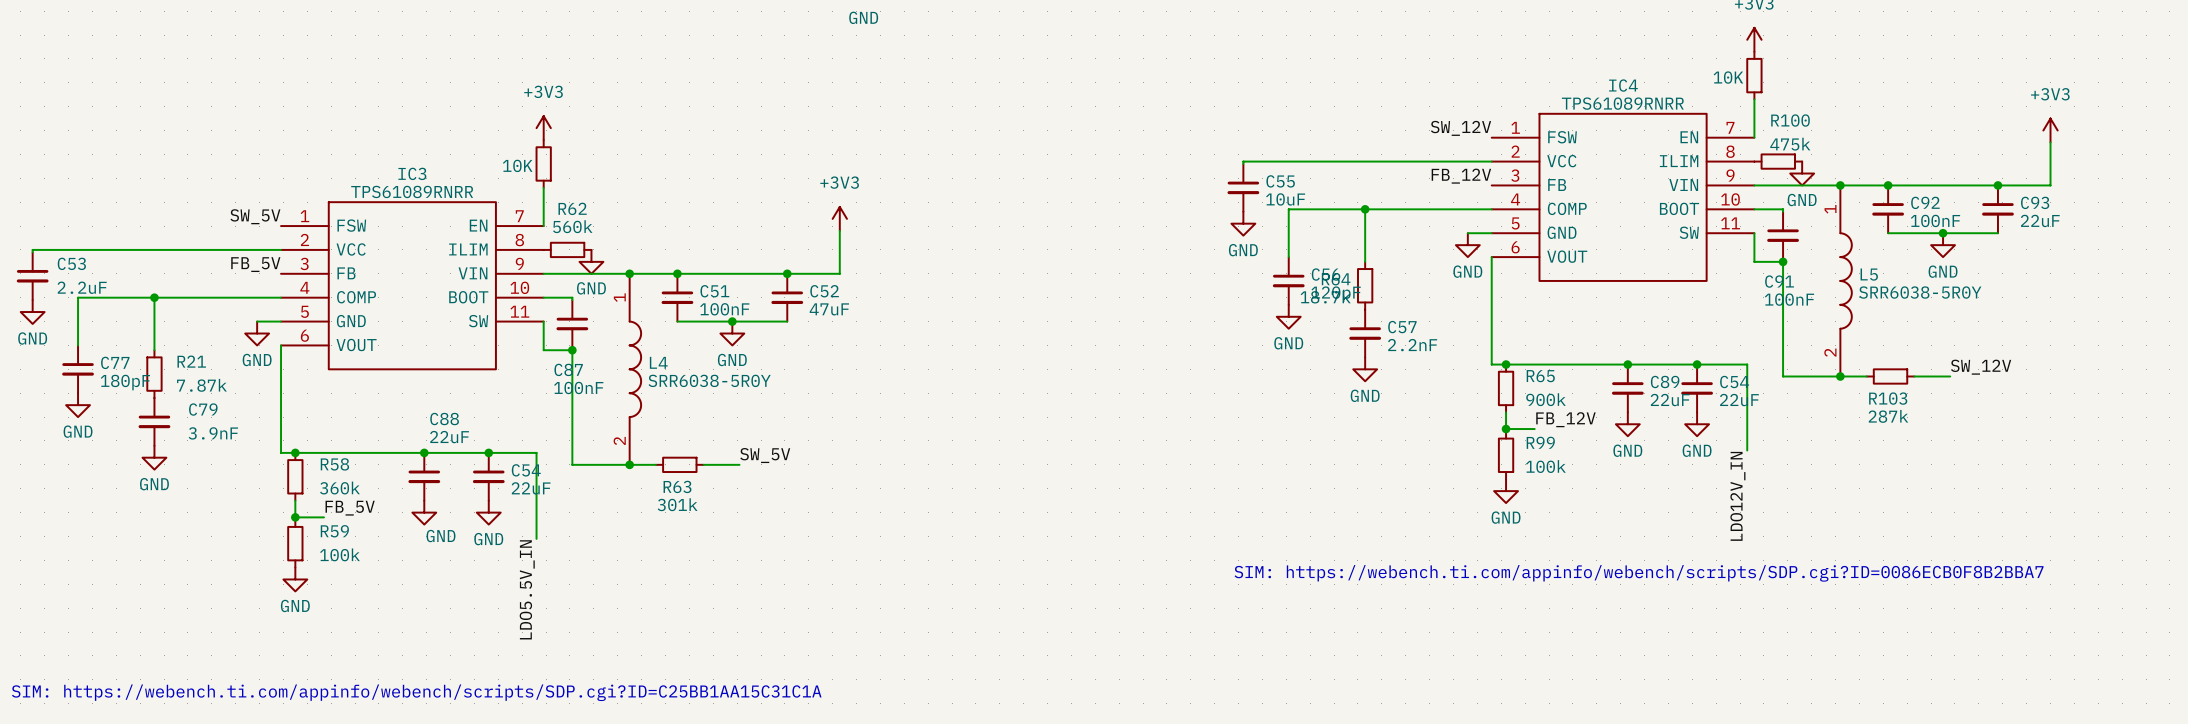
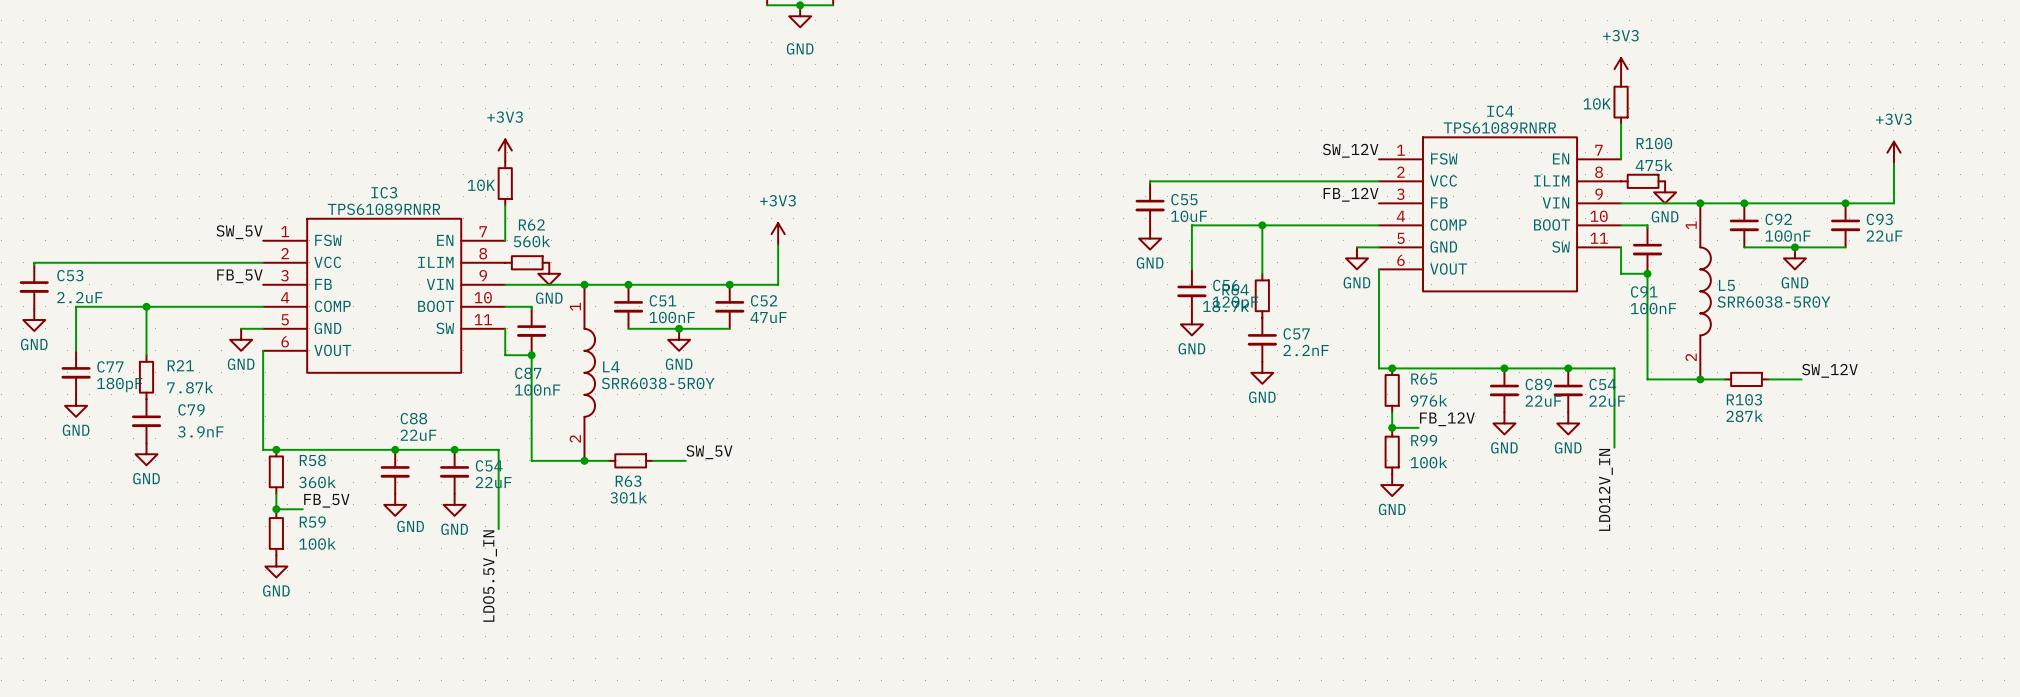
R65 value: 900k (1546, 399) -> 976k (1429, 400)
text: SIM: https://webench.ti.com/appinfo/webench/scripts/SDP.cgi?ID=0086ECB0F8B2BBA7 (1639, 573) -> none
text: SIM: https://webench.ti.com/appinfo/webench/scripts/SDP.cgi?ID=C25BB1AA15C31C1A (416, 692) -> none

